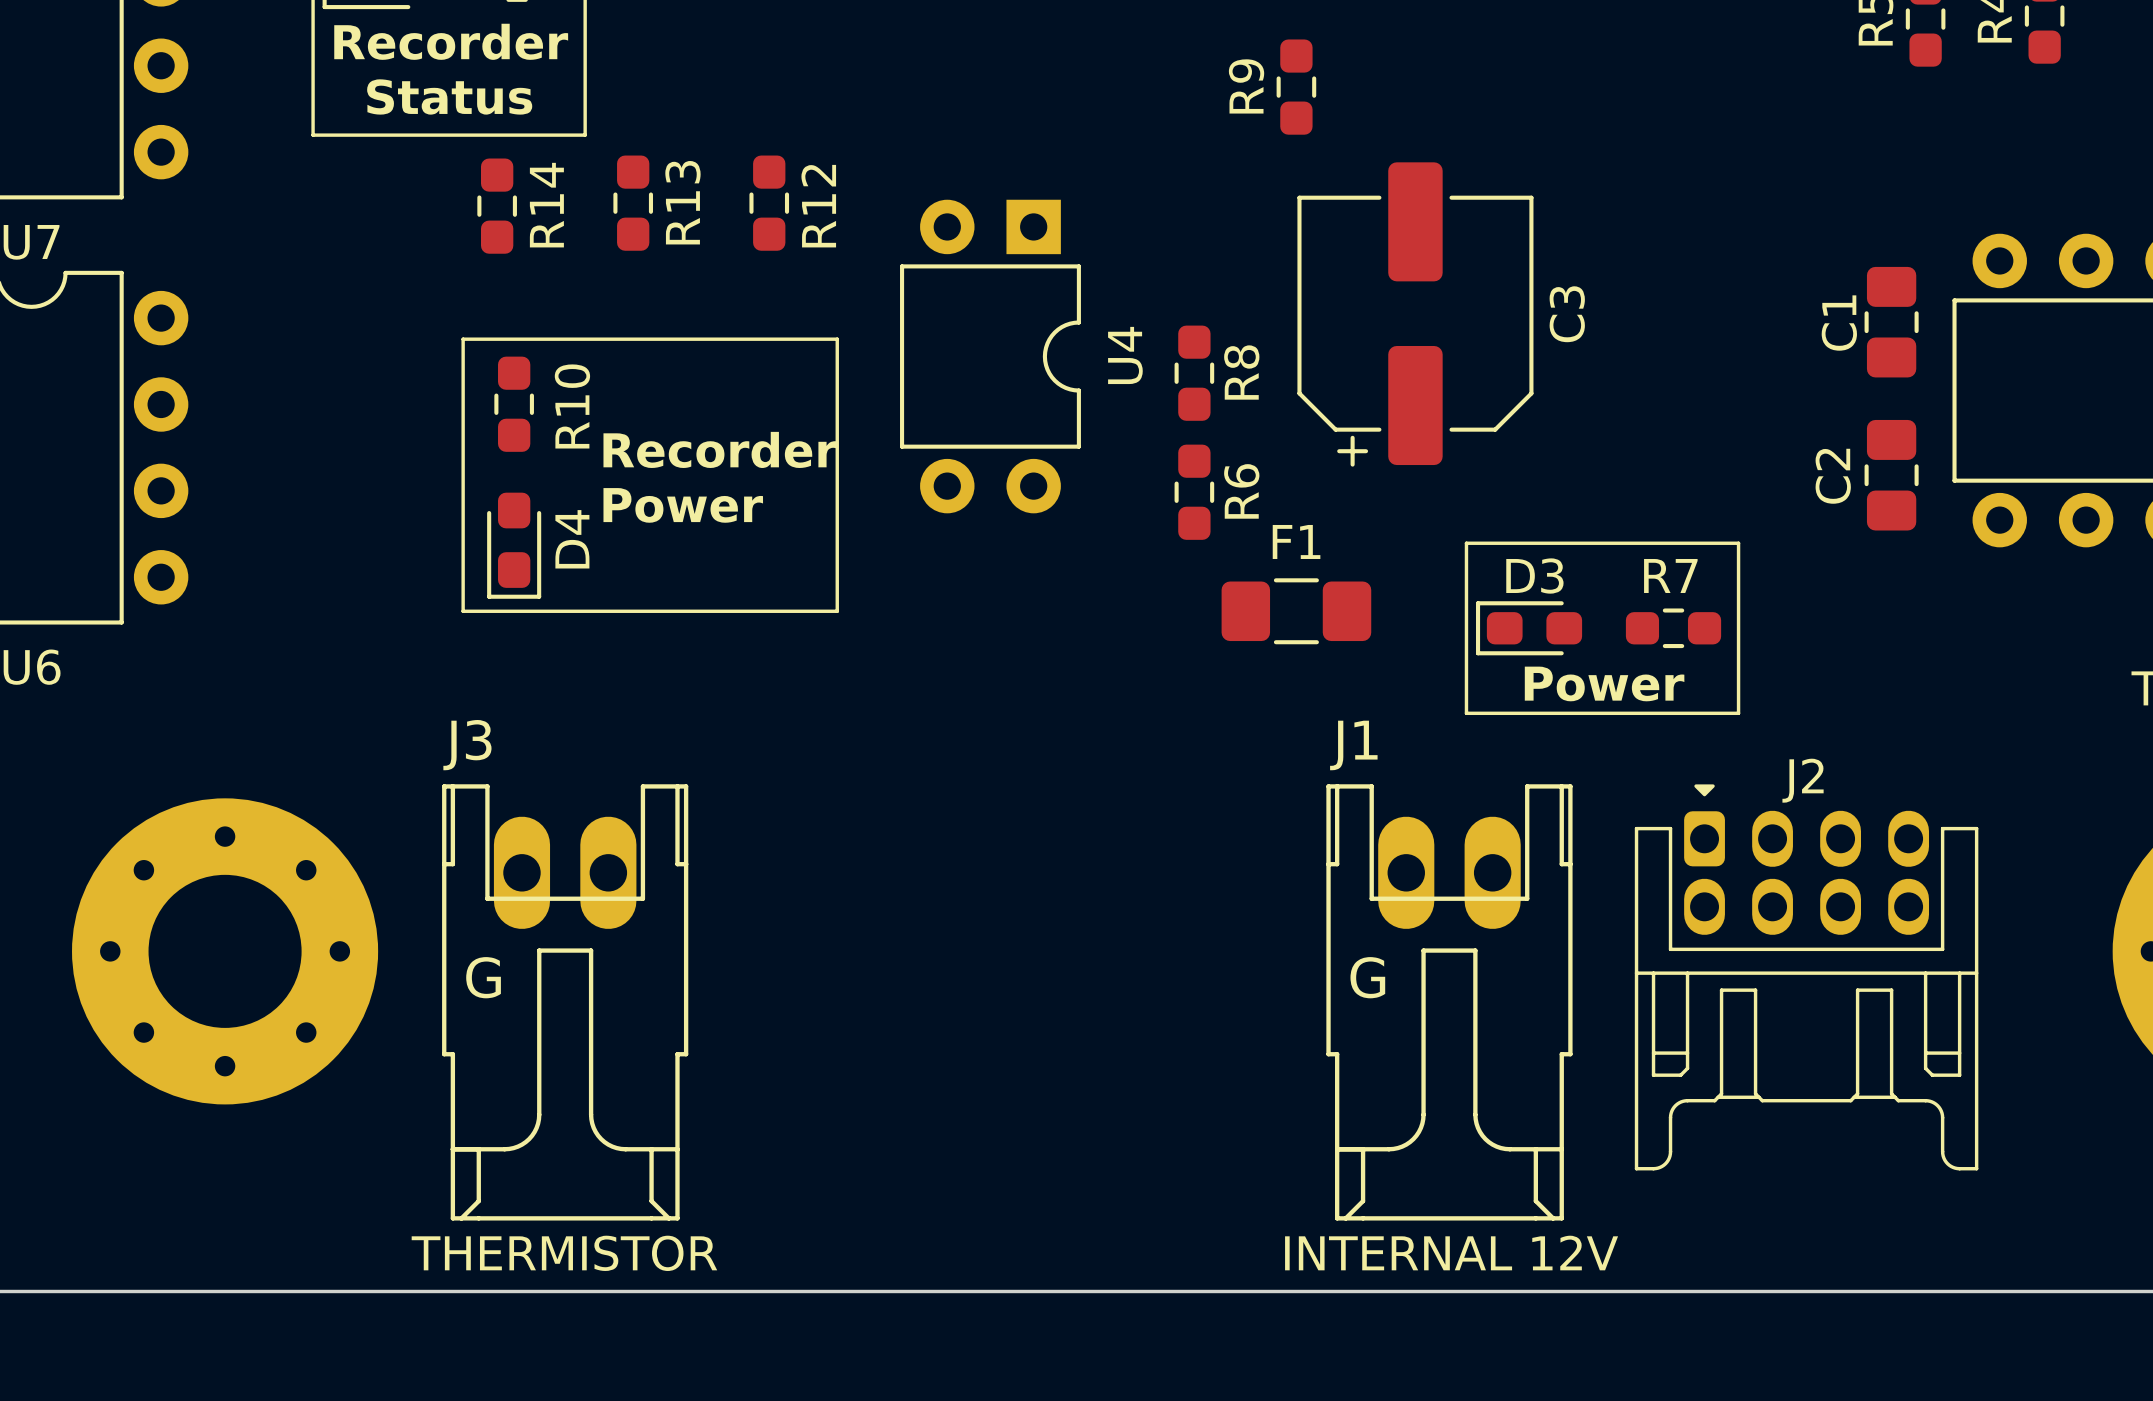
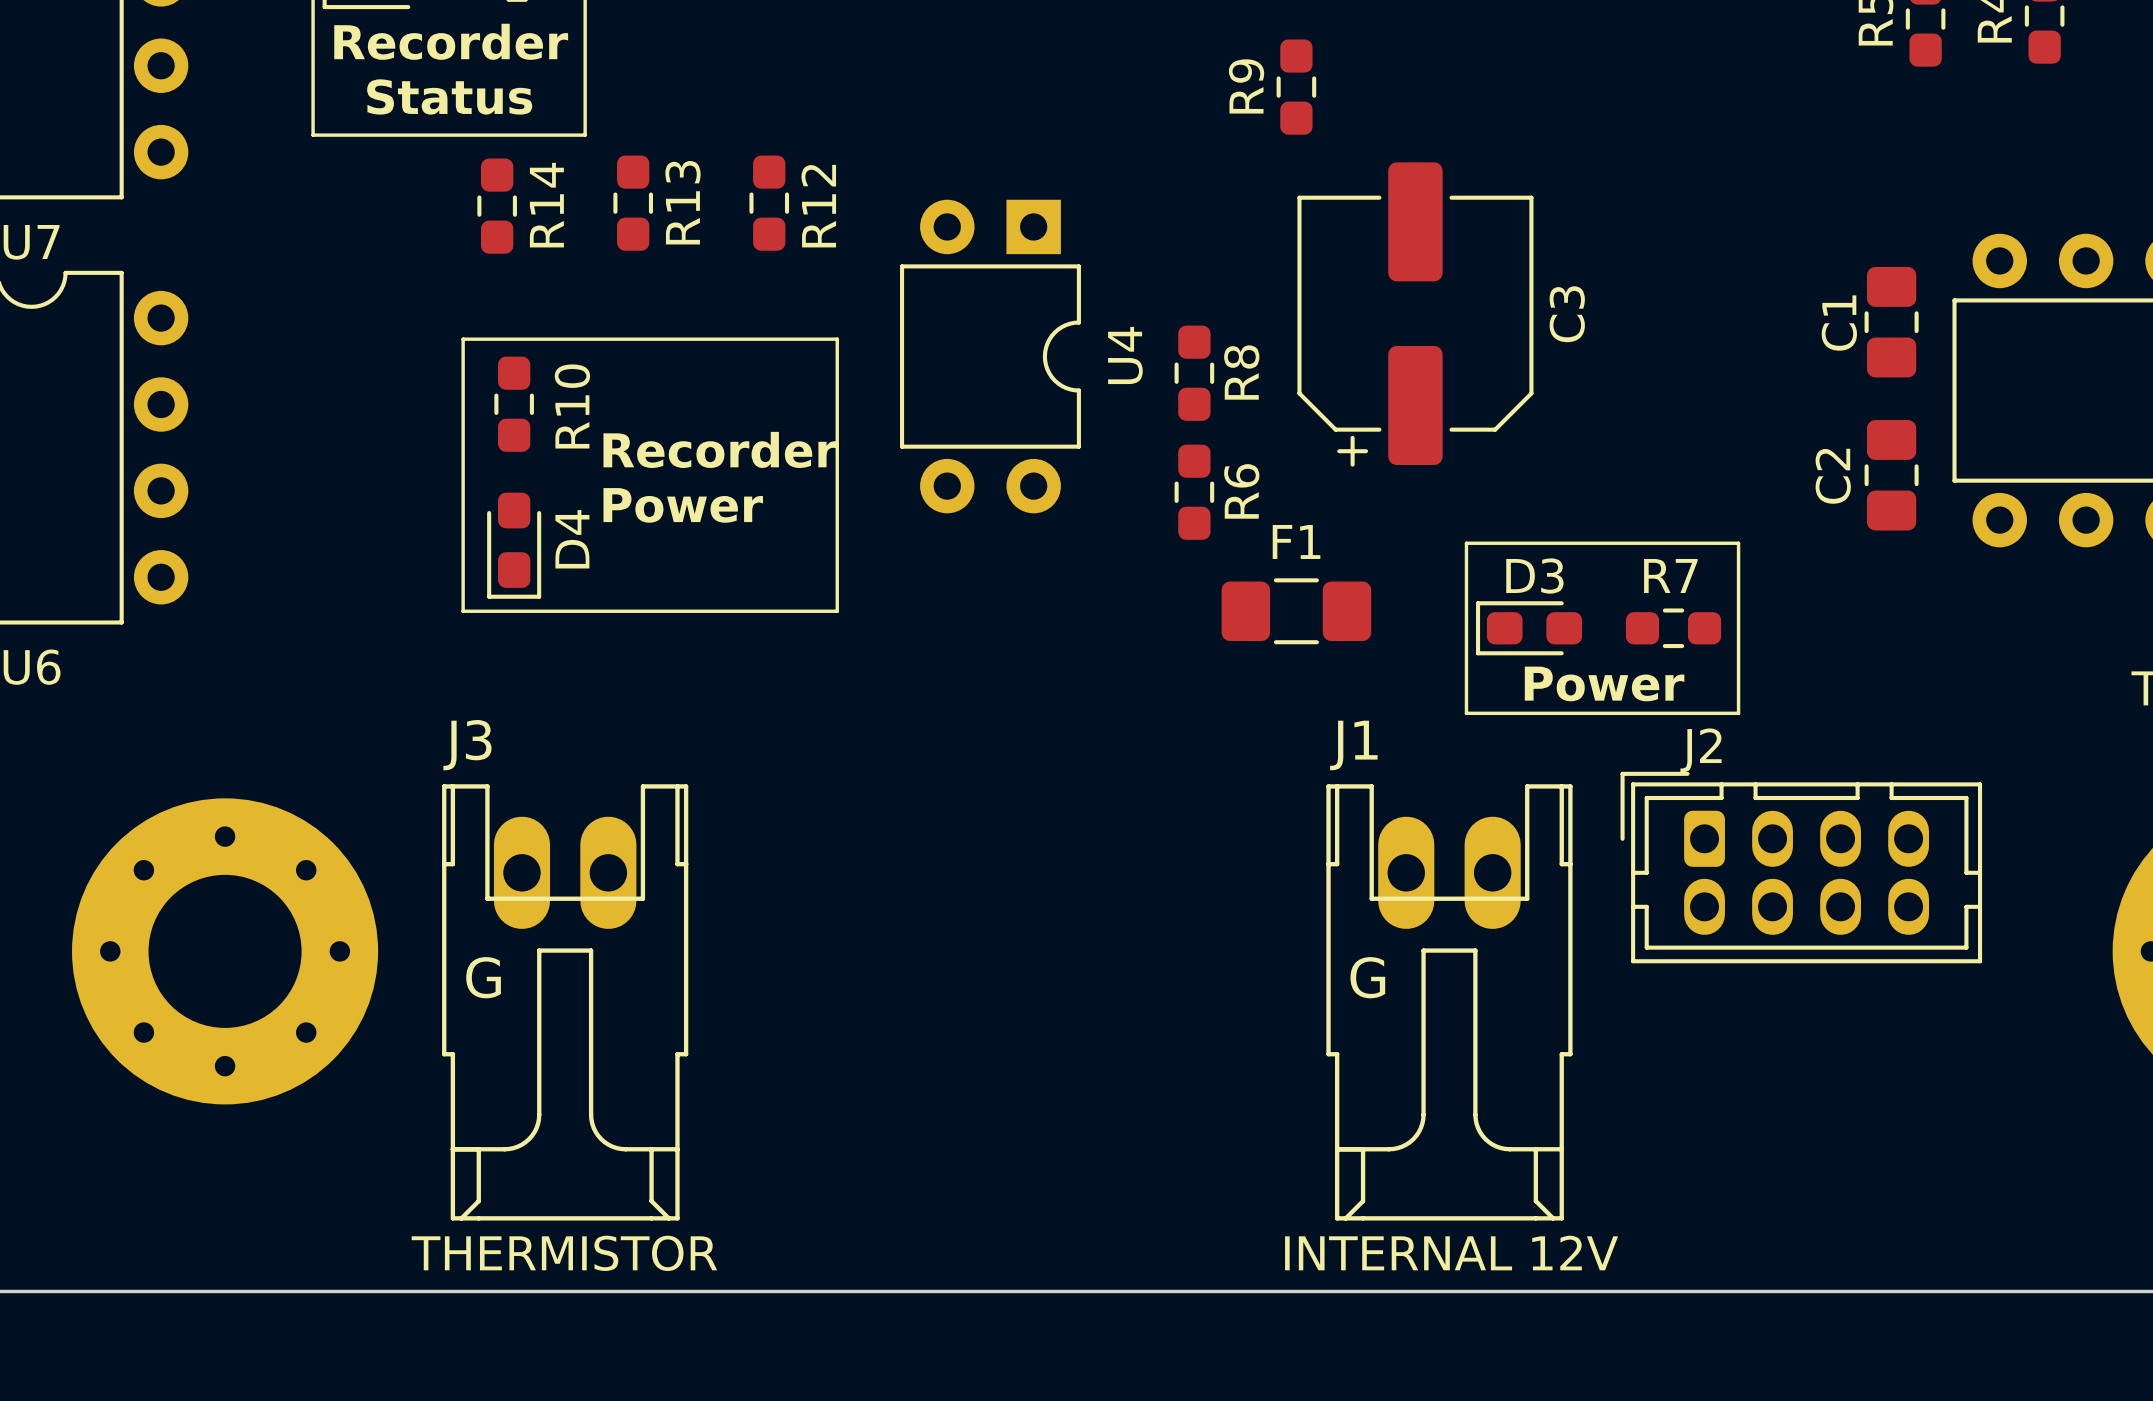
J2 name position: J2 (1803, 780) -> J2 (1701, 750)
J2 footprint: [1634, 784, 1979, 1171] -> [1620, 771, 1983, 964]

